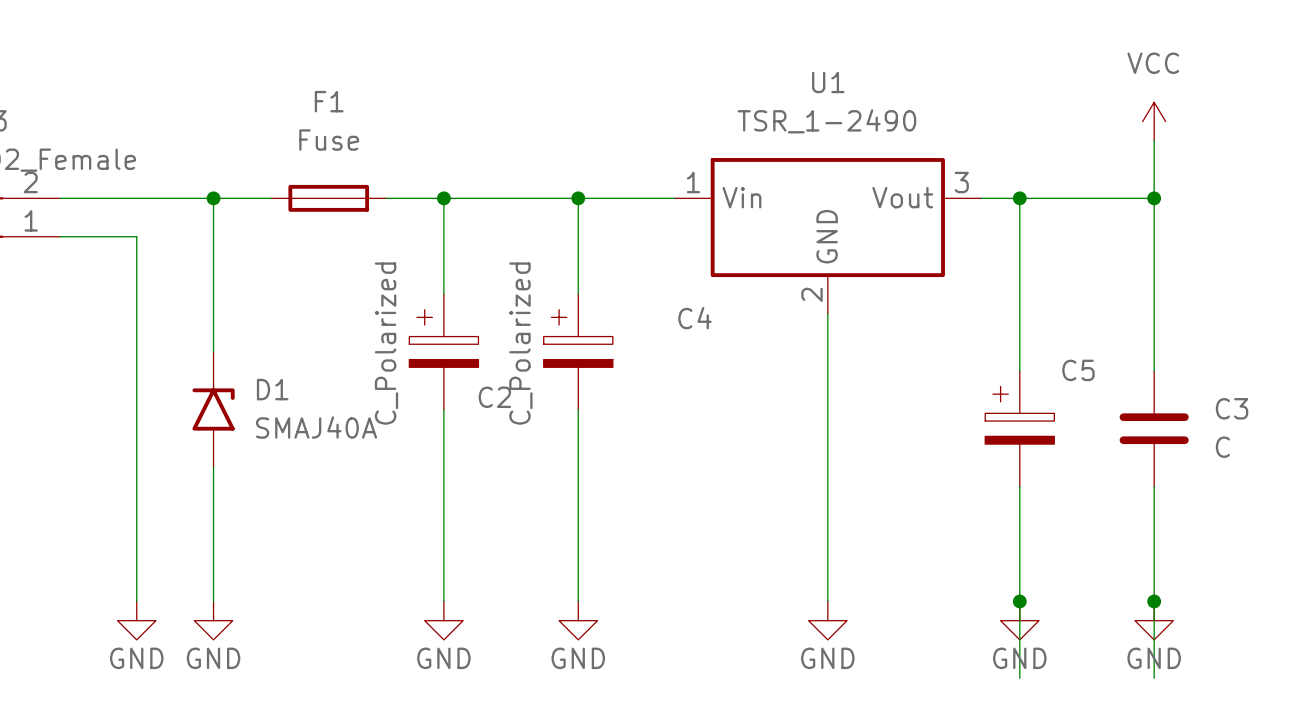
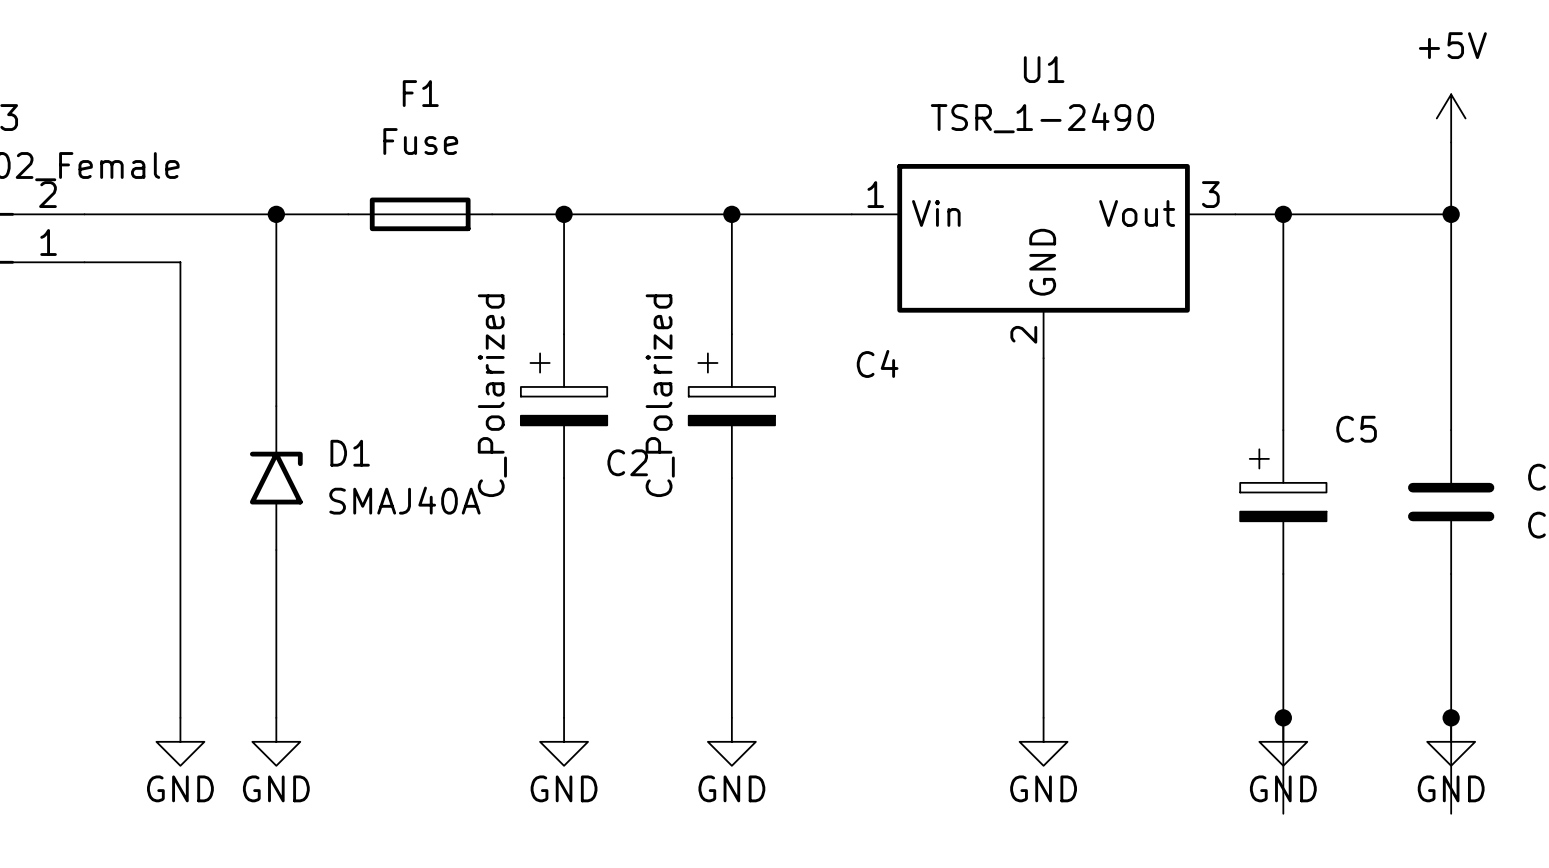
power symbol: VCC (1154, 121) -> +5V (1451, 118)

